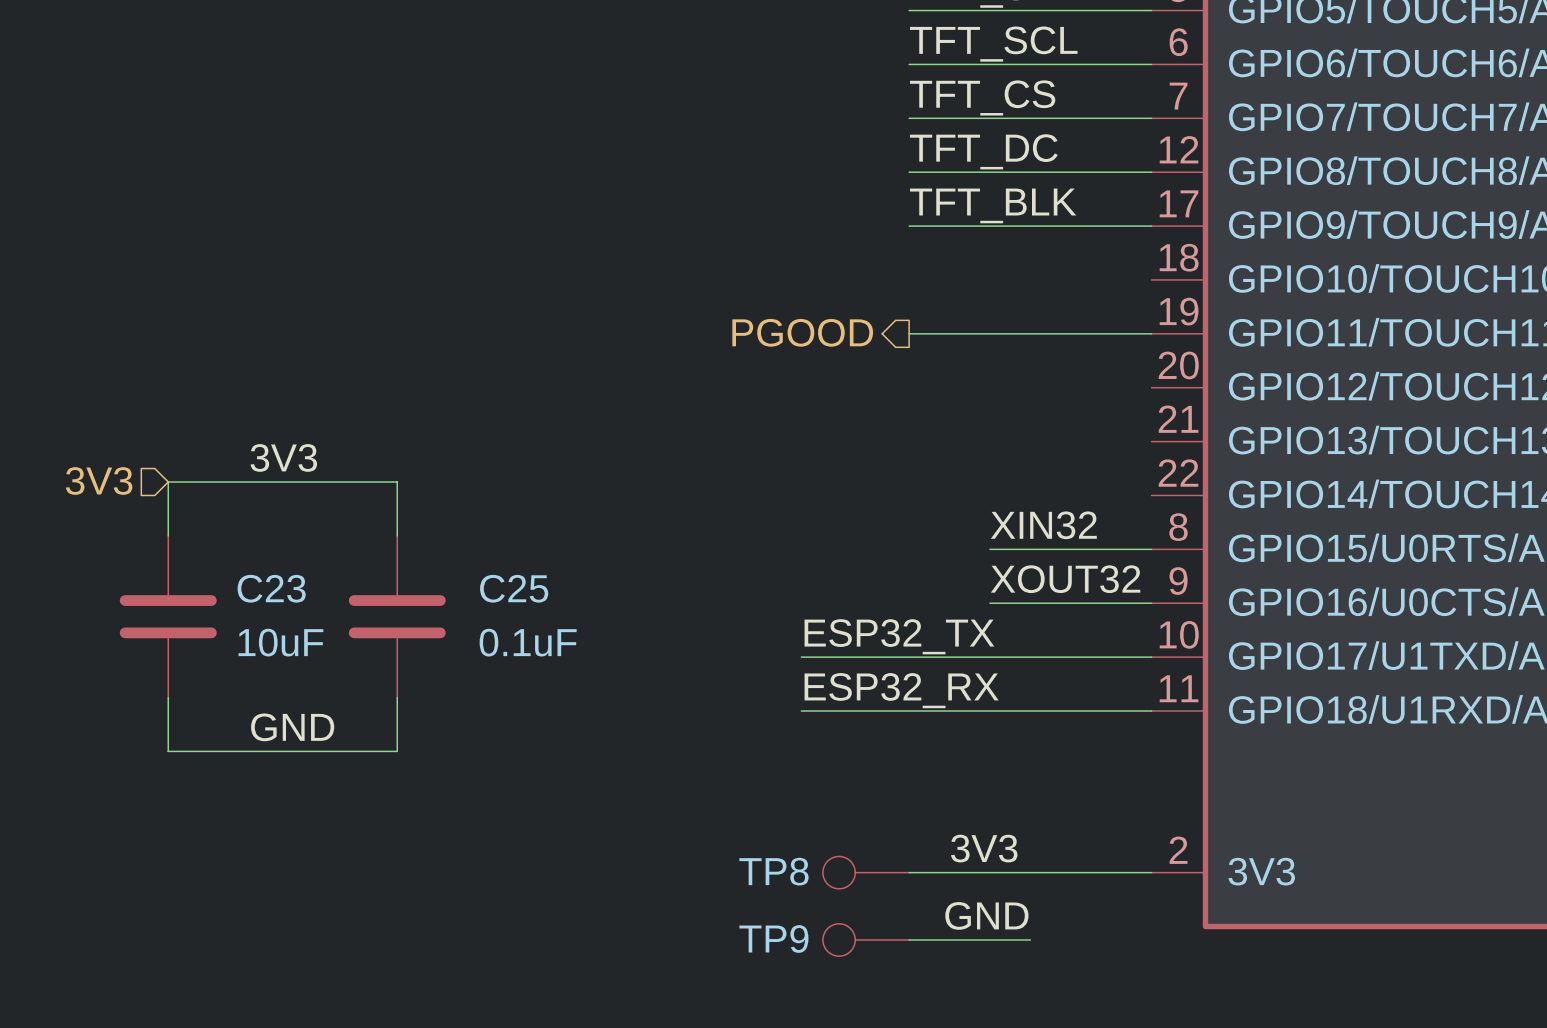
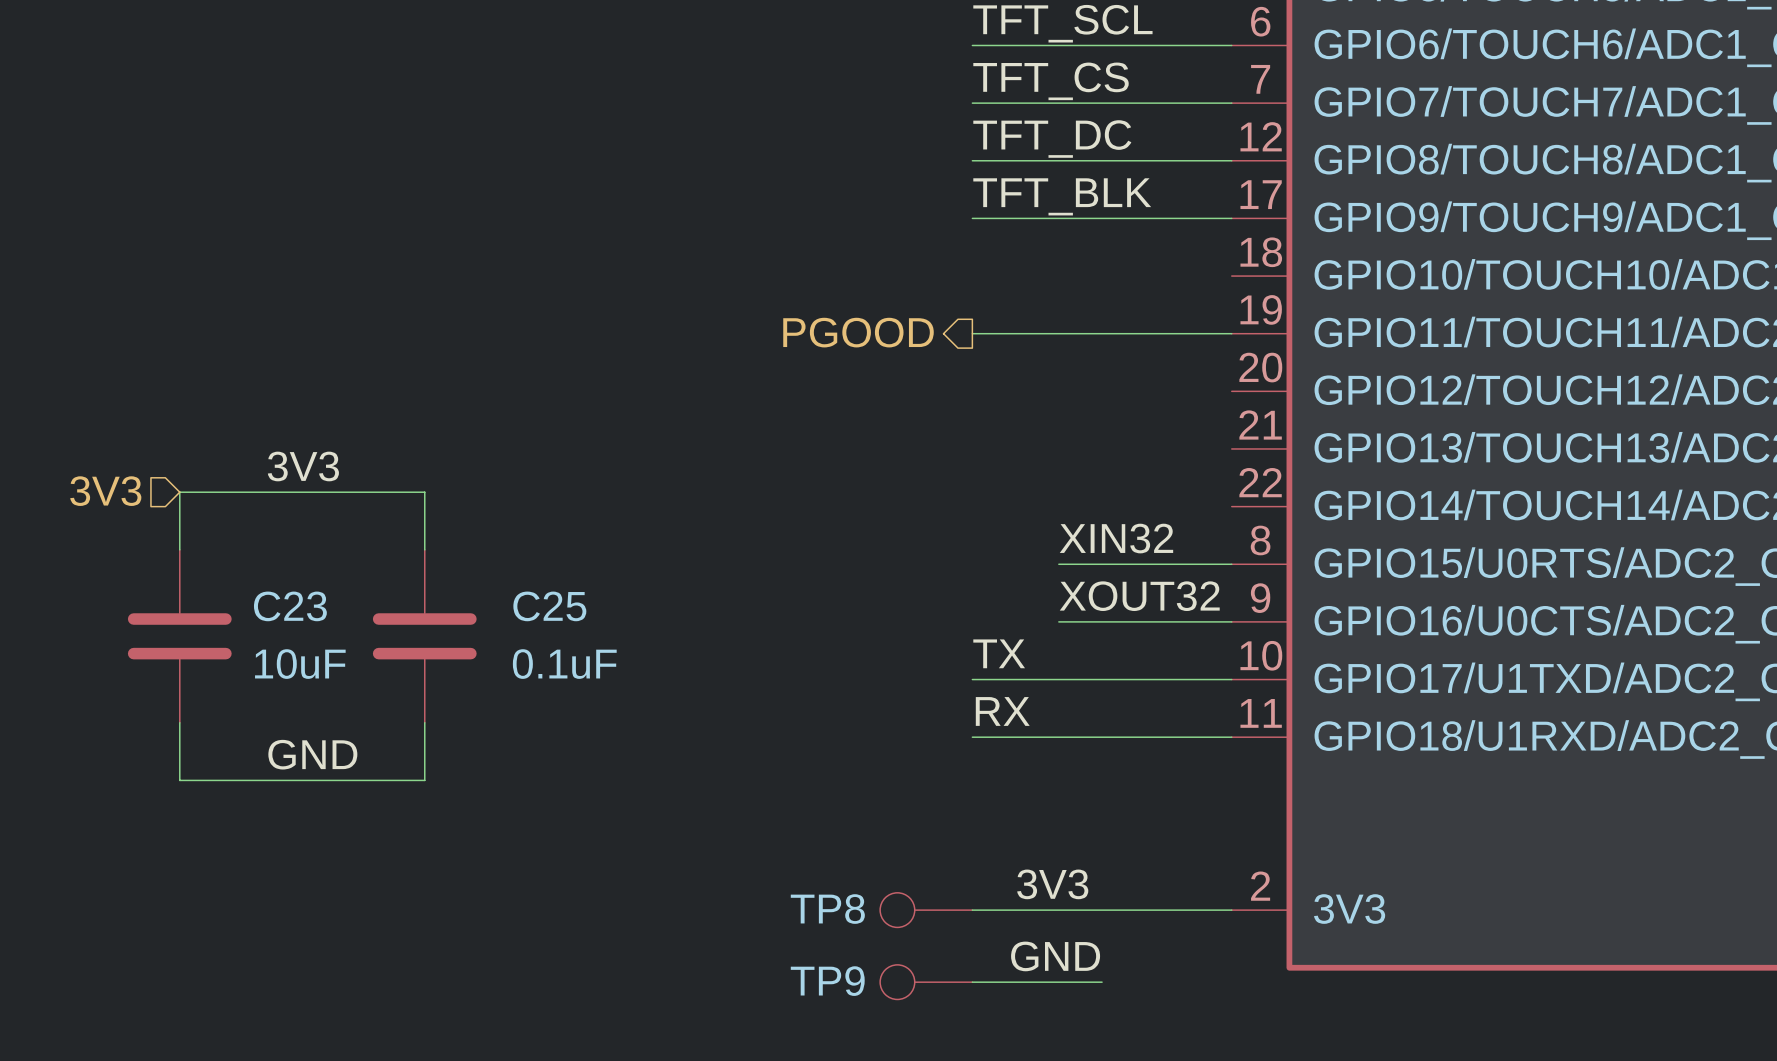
label: none -> TX (999, 653)
label: ESP32_TX (899, 636) -> none
wire: (801, 657) (909, 657) -> none
label: none -> RX (1002, 711)
label: ESP32_RX (901, 690) -> none
wire: (801, 711) (909, 711) -> none

